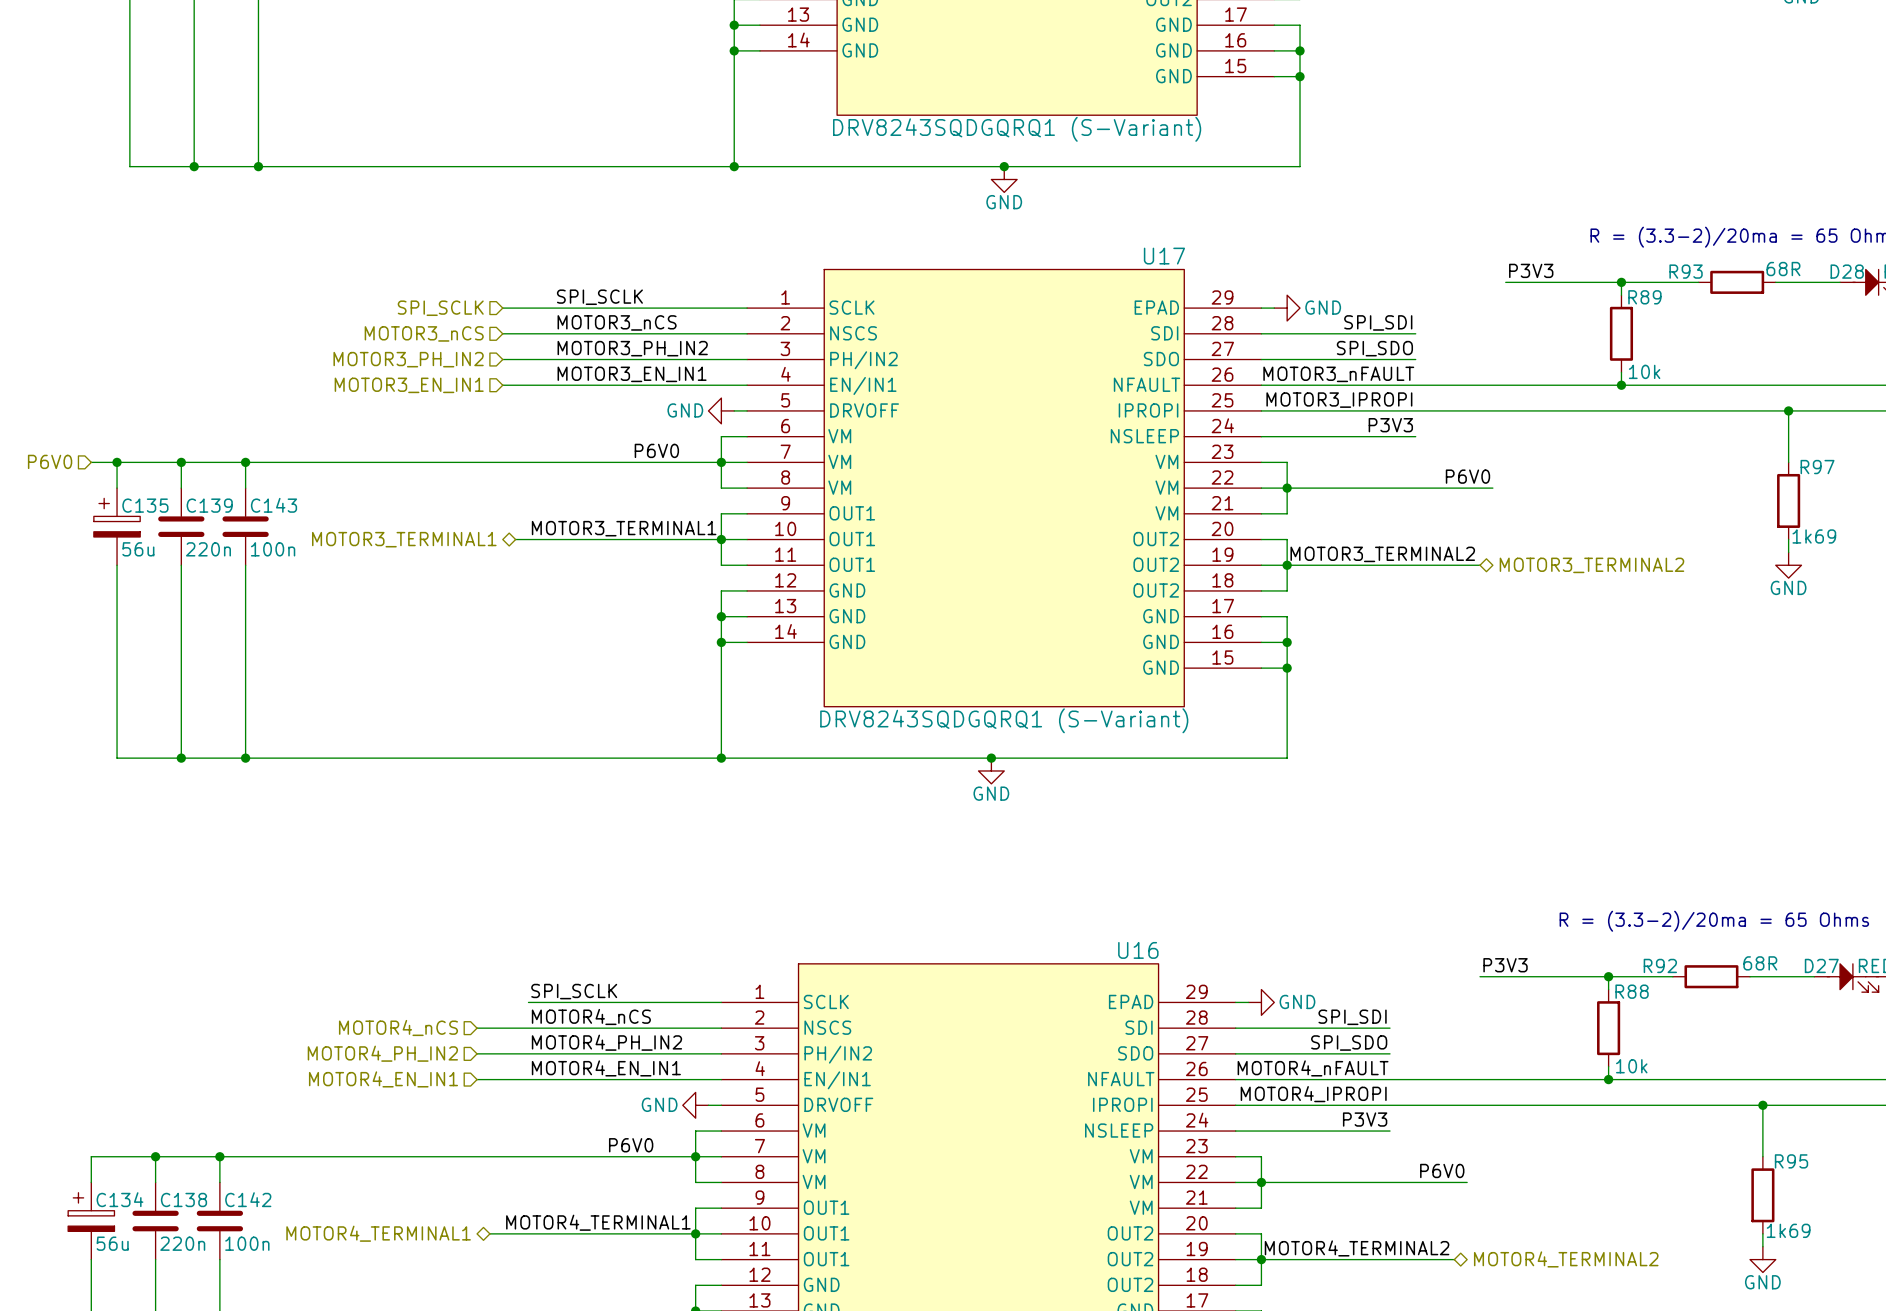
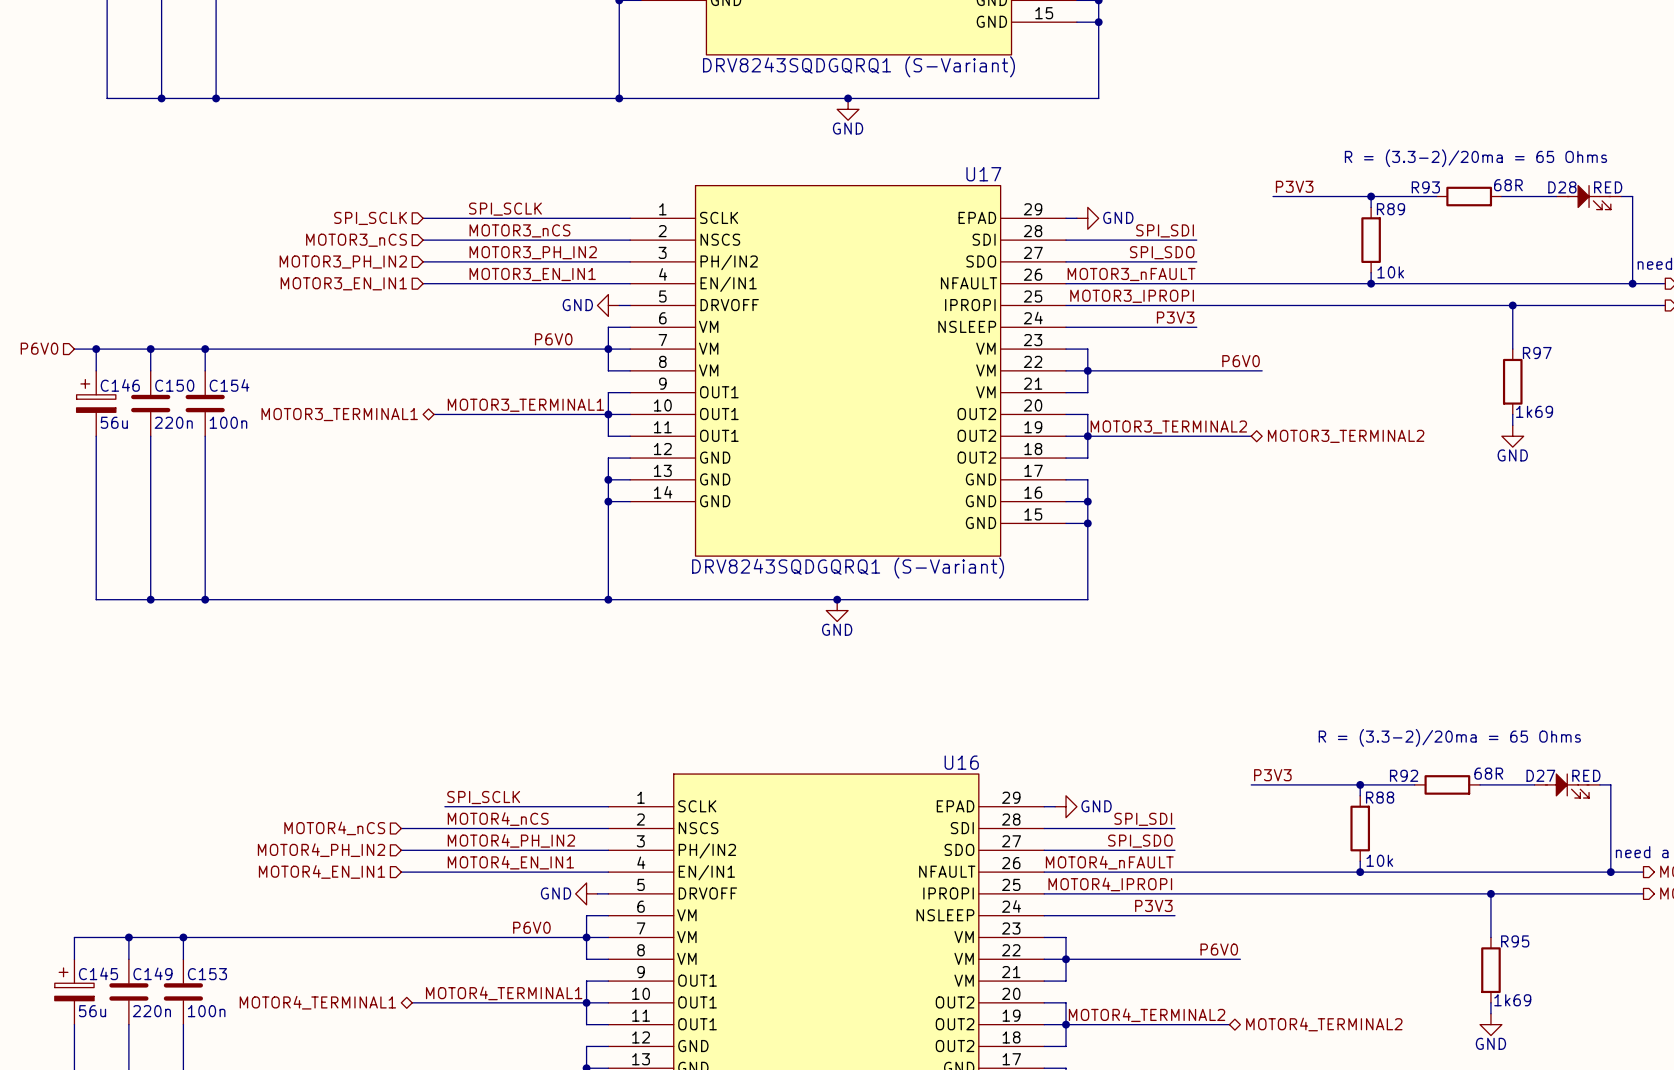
C135 name: C135 (145, 505) -> C146 (120, 385)
C139 name: C139 (209, 505) -> C150 (174, 385)
C143 name: C143 (273, 505) -> C154 (229, 385)
C134 name: C134 (120, 1199) -> C145 (98, 973)
C138 name: C138 (183, 1199) -> C149 (152, 973)
C142 name: C142 (248, 1199) -> C153 (207, 974)

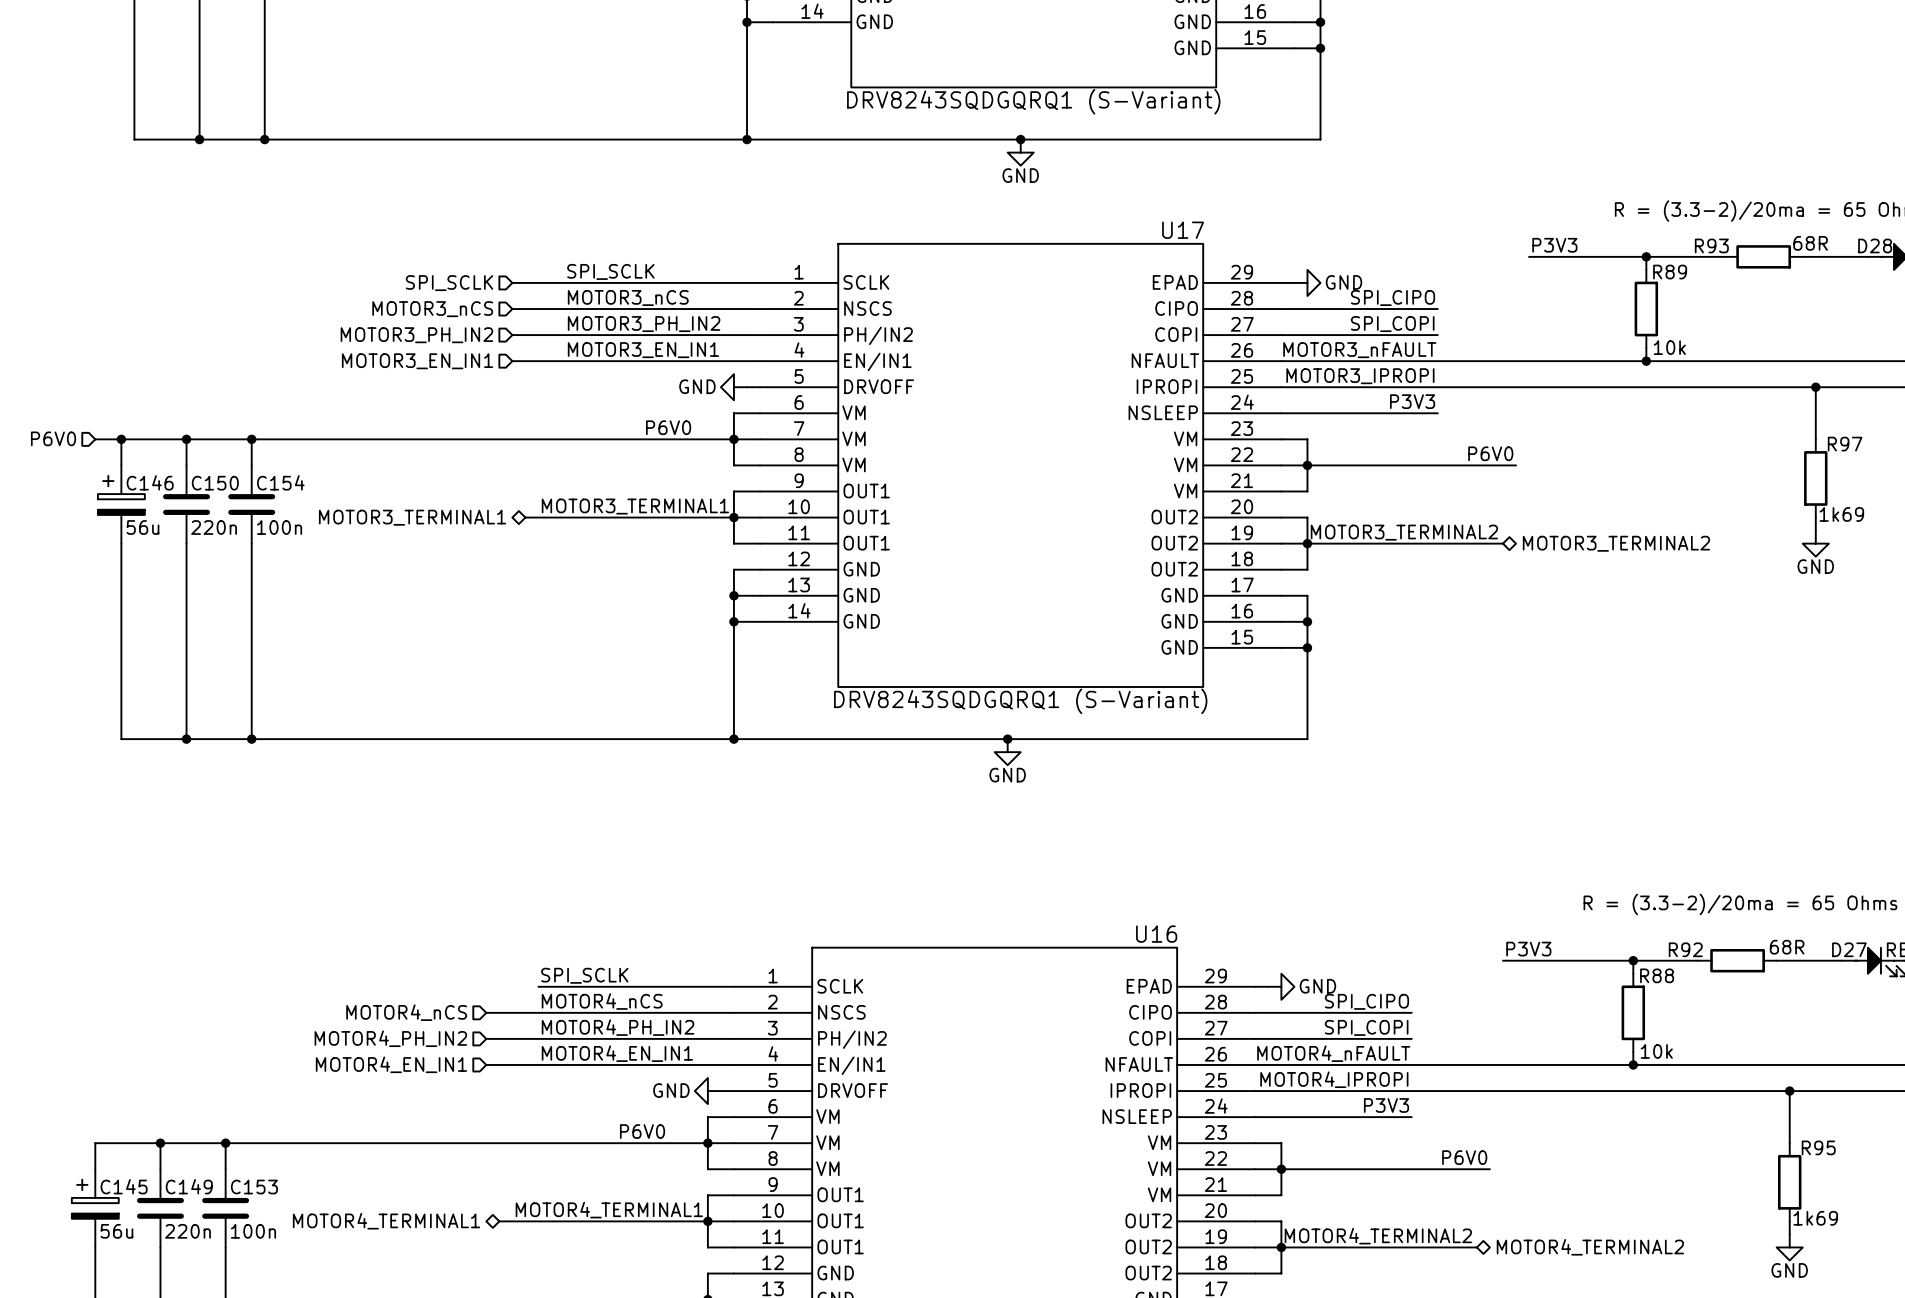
label: SPI_SDI (1165, 230) -> SPI_CIPO (1393, 298)
U17 pin name: SDI (984, 239) -> CIPO (1176, 308)
label: SPI_SDO (1162, 252) -> SPI_COPI (1392, 324)
U17 pin name: SDO (981, 261) -> COPI (1176, 334)
label: SPI_SDI (1143, 819) -> SPI_CIPO (1366, 1001)
U16 pin name: SDI (962, 828) -> CIPO (1150, 1012)
label: SPI_SDO (1140, 841) -> SPI_COPI (1366, 1027)
U16 pin name: SDO (959, 849) -> COPI (1150, 1038)

